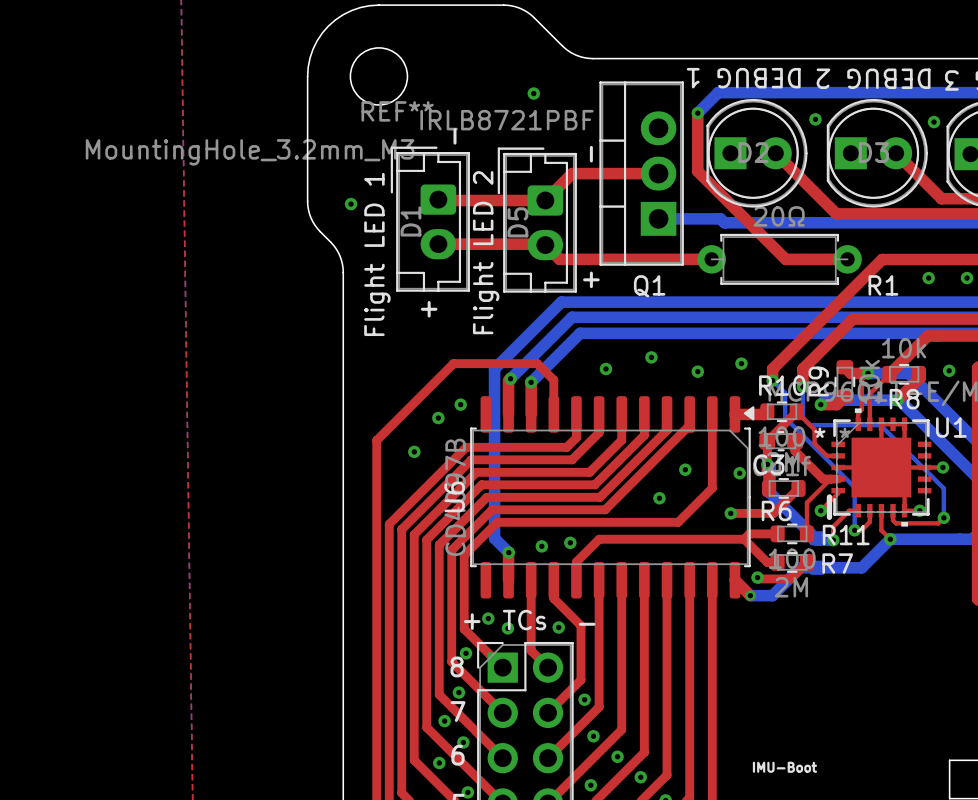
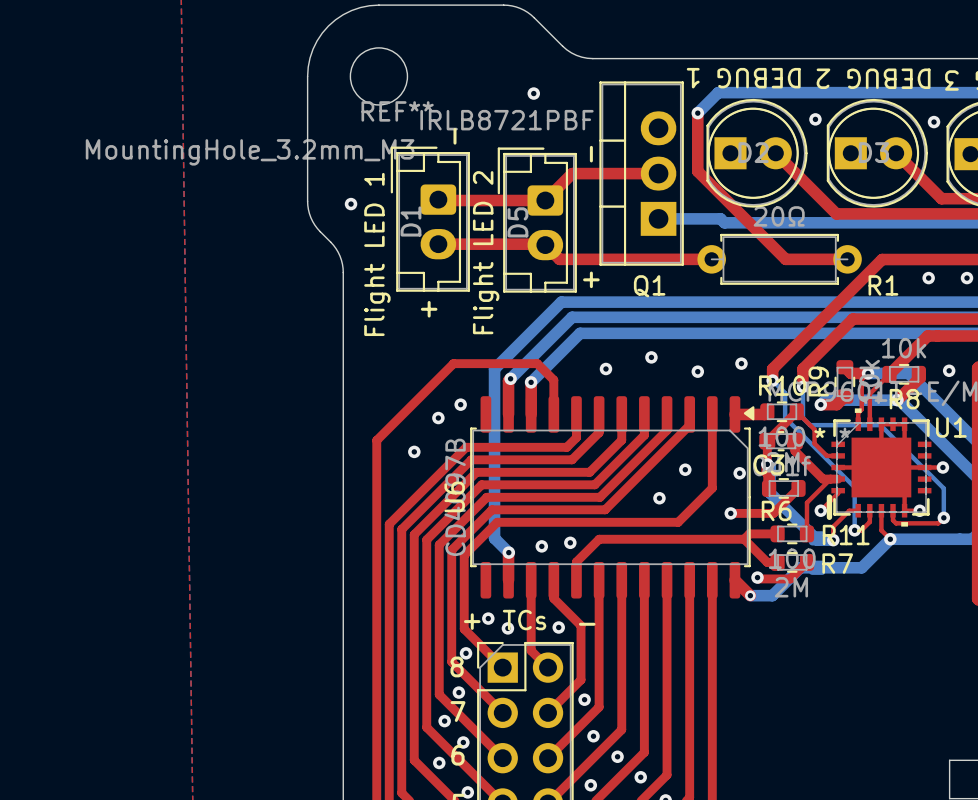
text: IMU-Boot (784, 767) -> none

